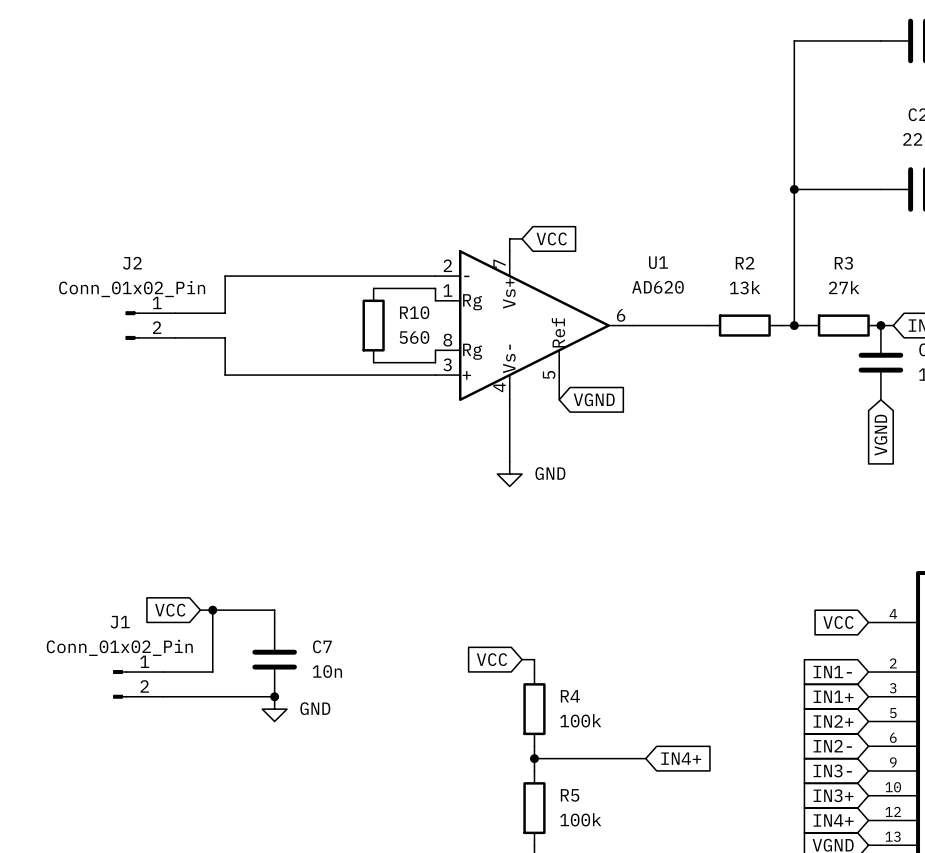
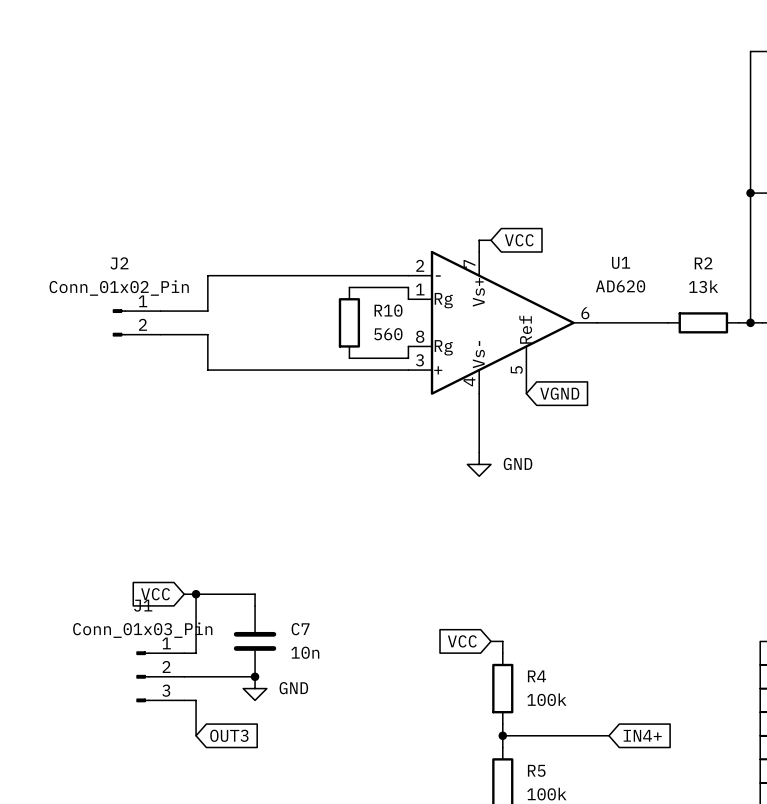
J1 value: Conn_01x02_Pin (119, 647) -> Conn_01x03_Pin (142, 630)
J1 symbol: [113, 670, 164, 699] -> [136, 651, 185, 703]
wire: none -> (184, 700) (196, 700) (196, 735)
global label: none -> OUT3 (229, 735)

